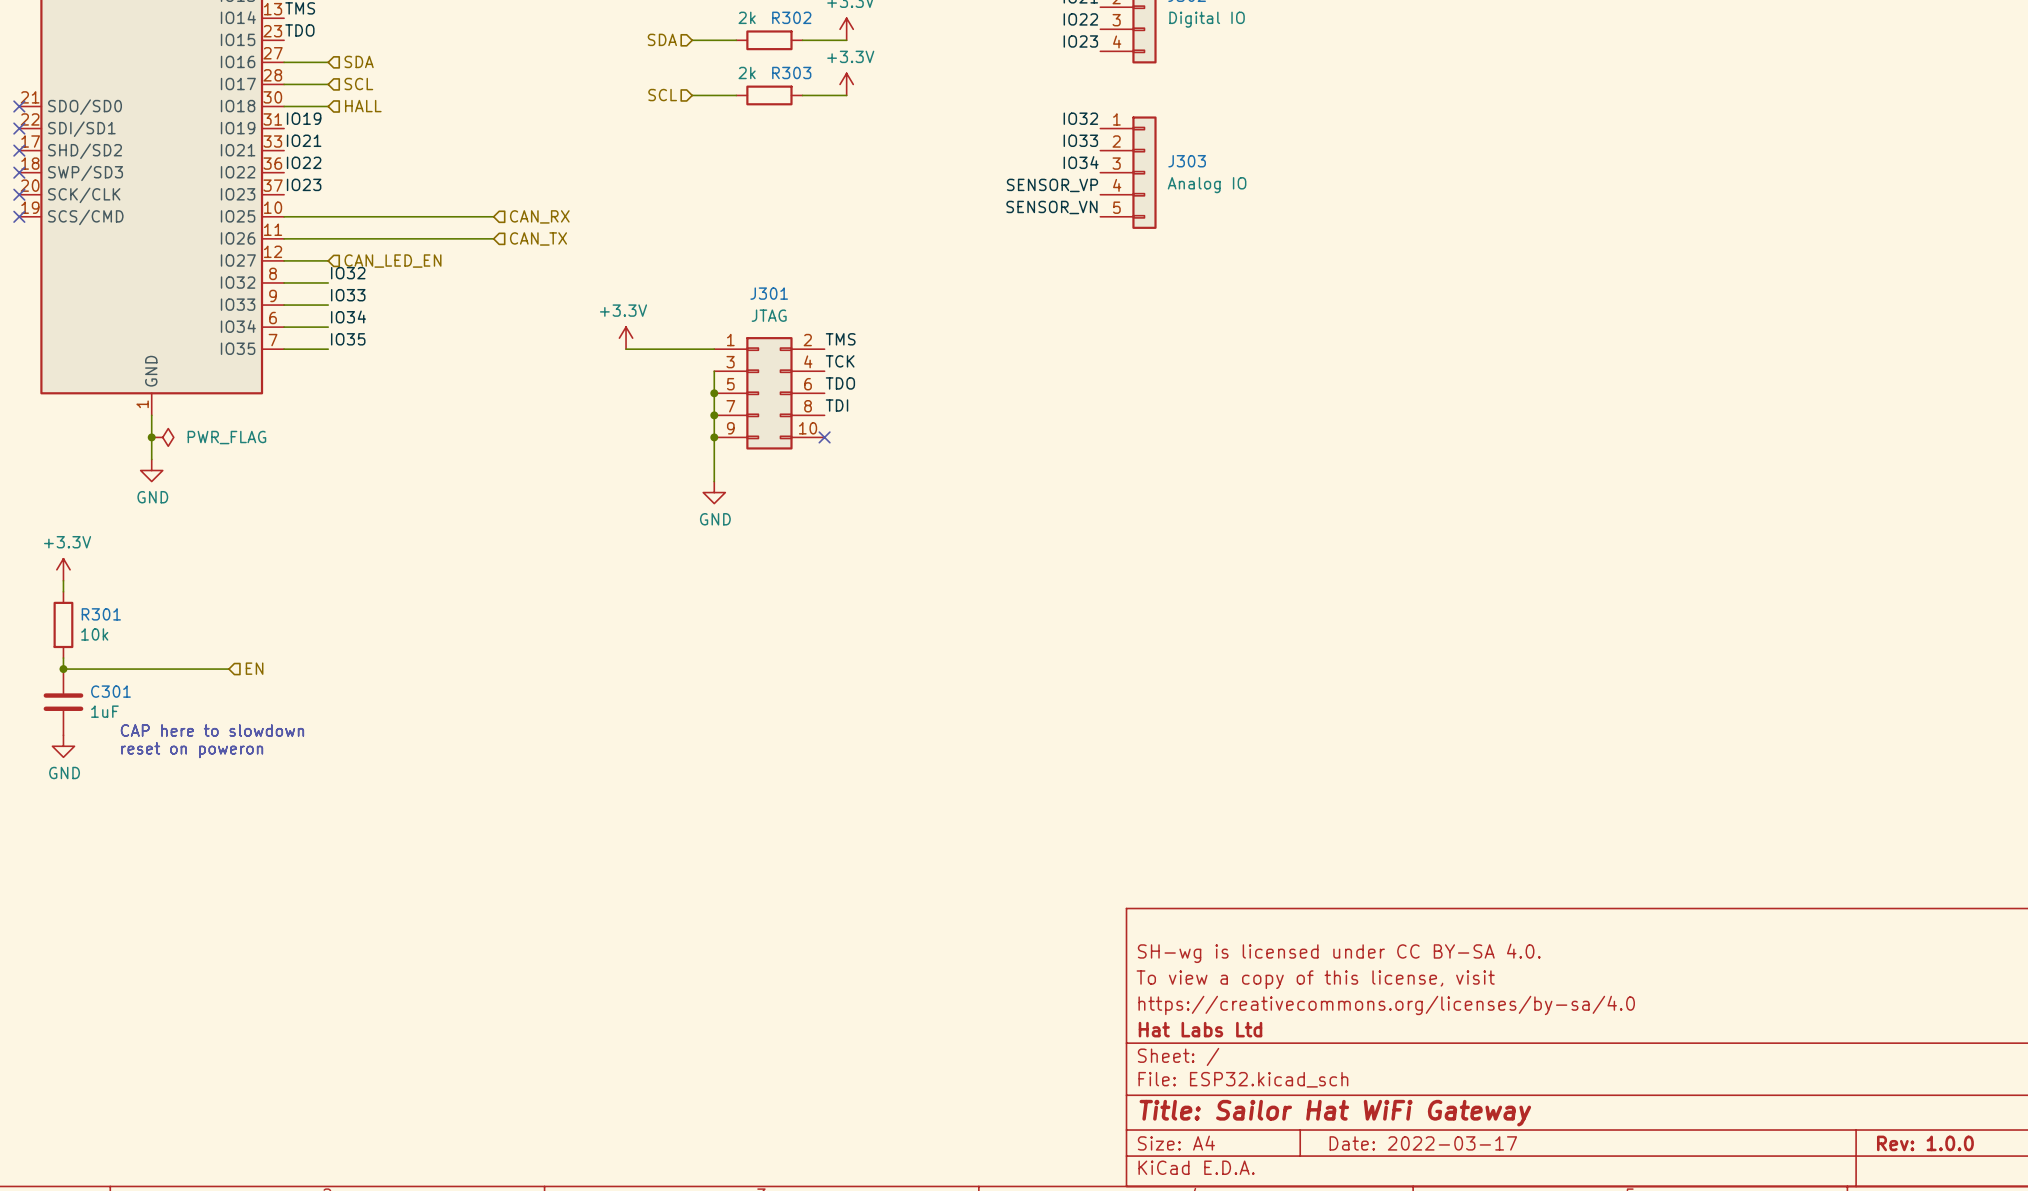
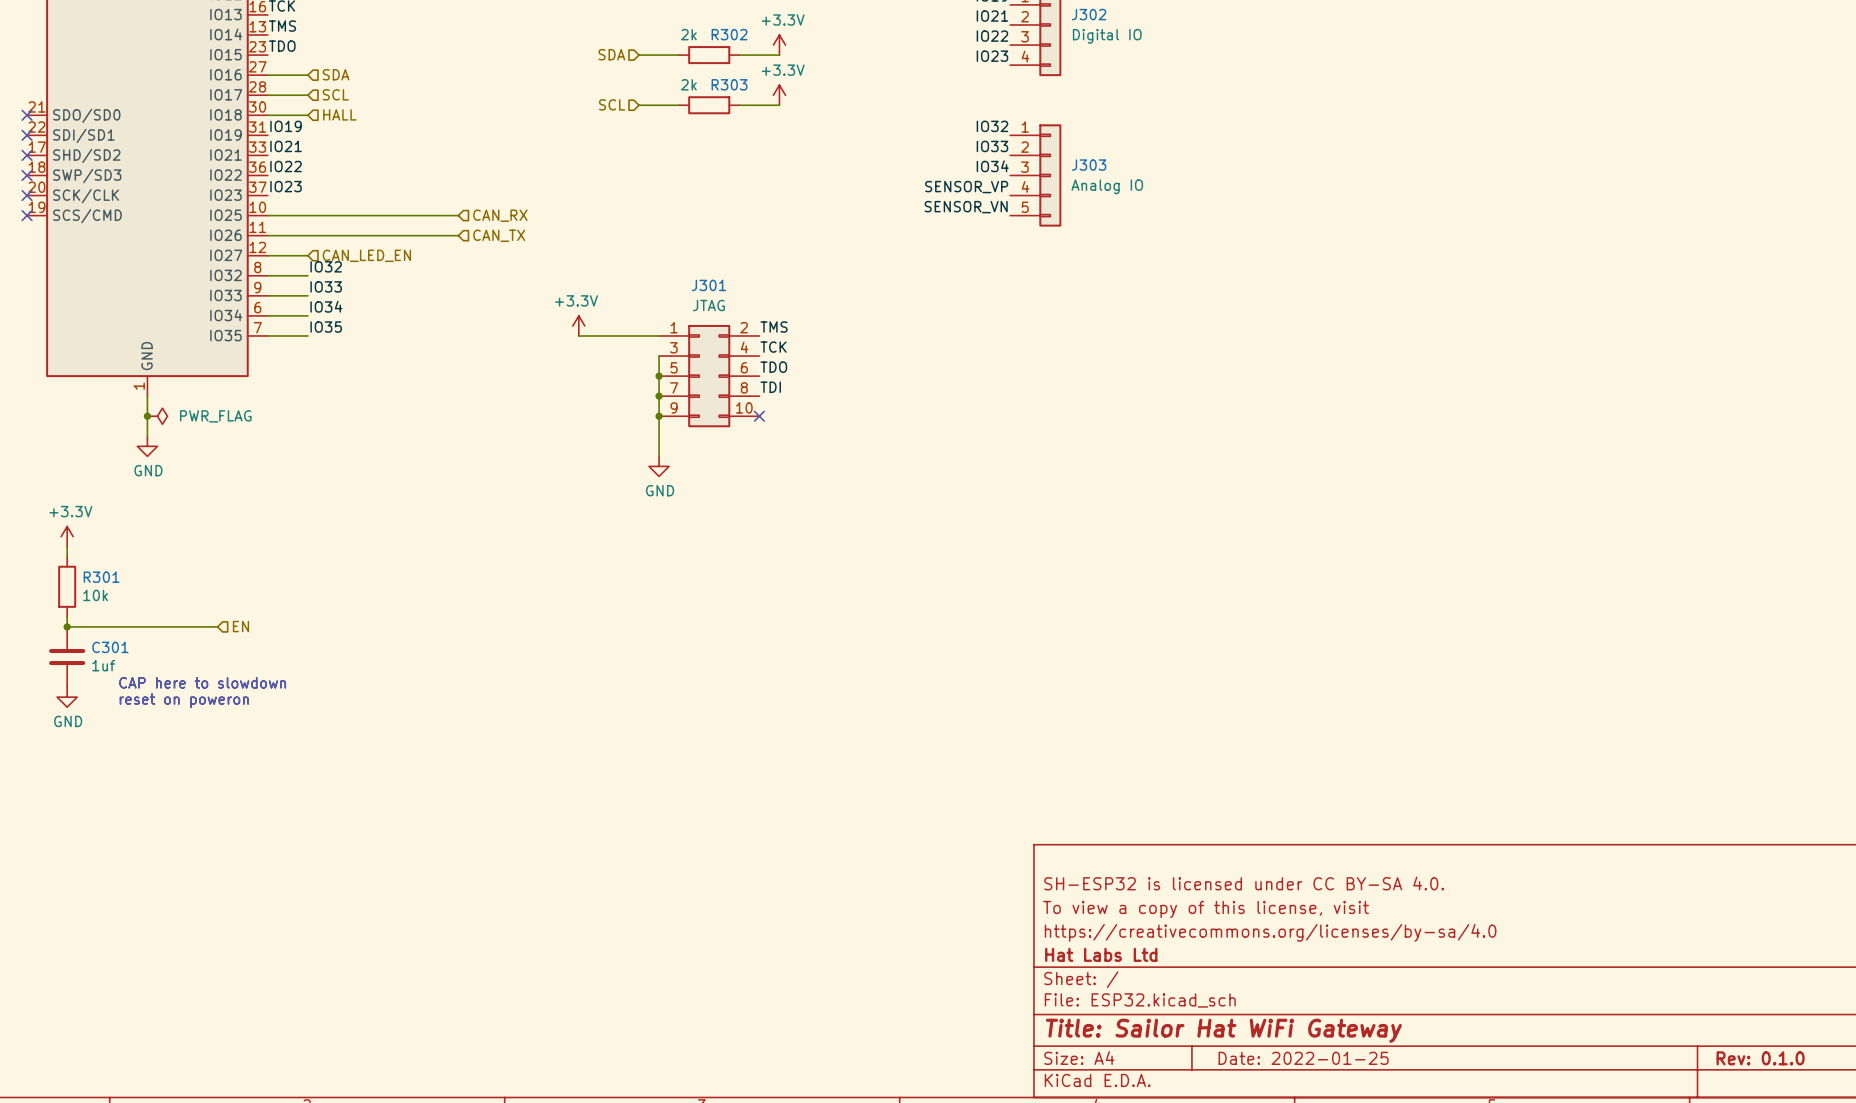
C301 value: 1uF (104, 711) -> 1uf (103, 665)
title block: SH-wg is licensed under CC BY-SA 4.0. (1339, 953) -> SH-ESP32 is licensed under CC BY-SA 4.0. (1244, 883)
title block: Date: 2022-03-17 (1423, 1143) -> Date: 2022-01-25 (1303, 1058)
title block: Rev: 1.0.0 (1925, 1143) -> Rev: 0.1.0 (1760, 1058)

